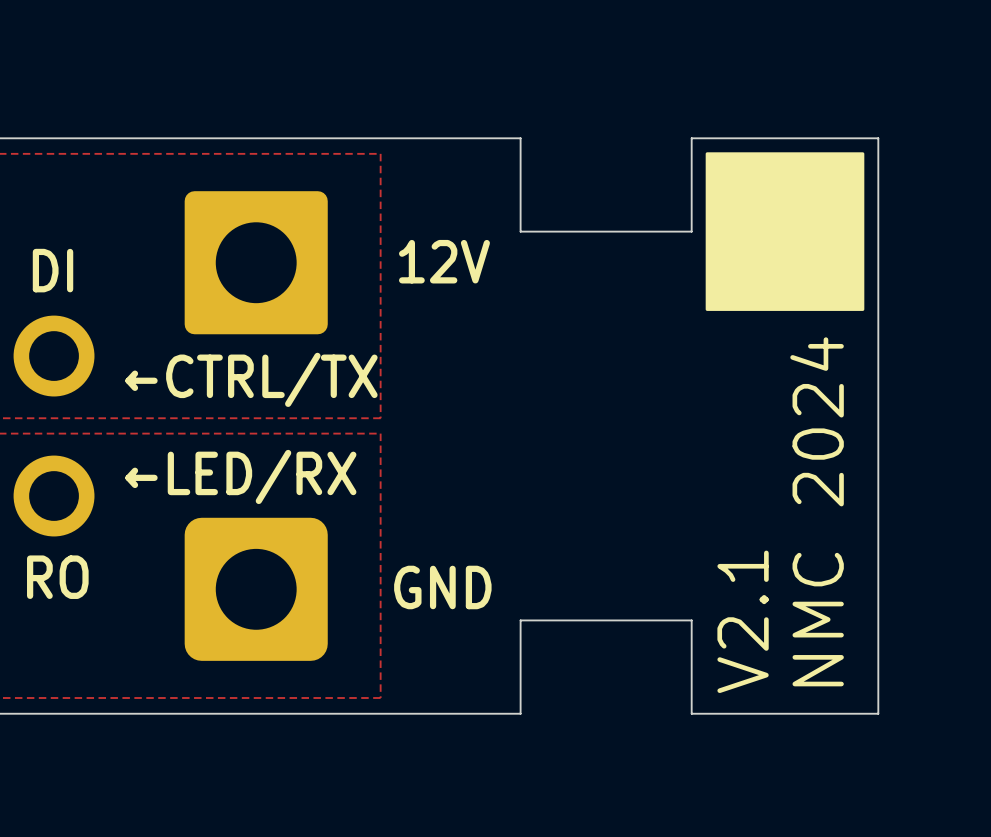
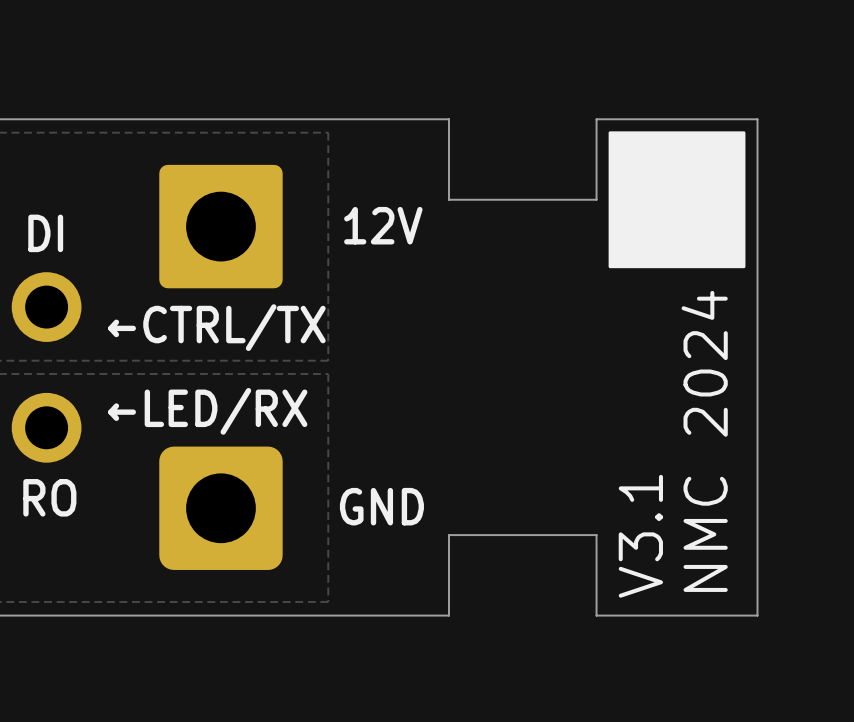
text: V2.1 (743, 621) -> V3.1 (640, 536)

